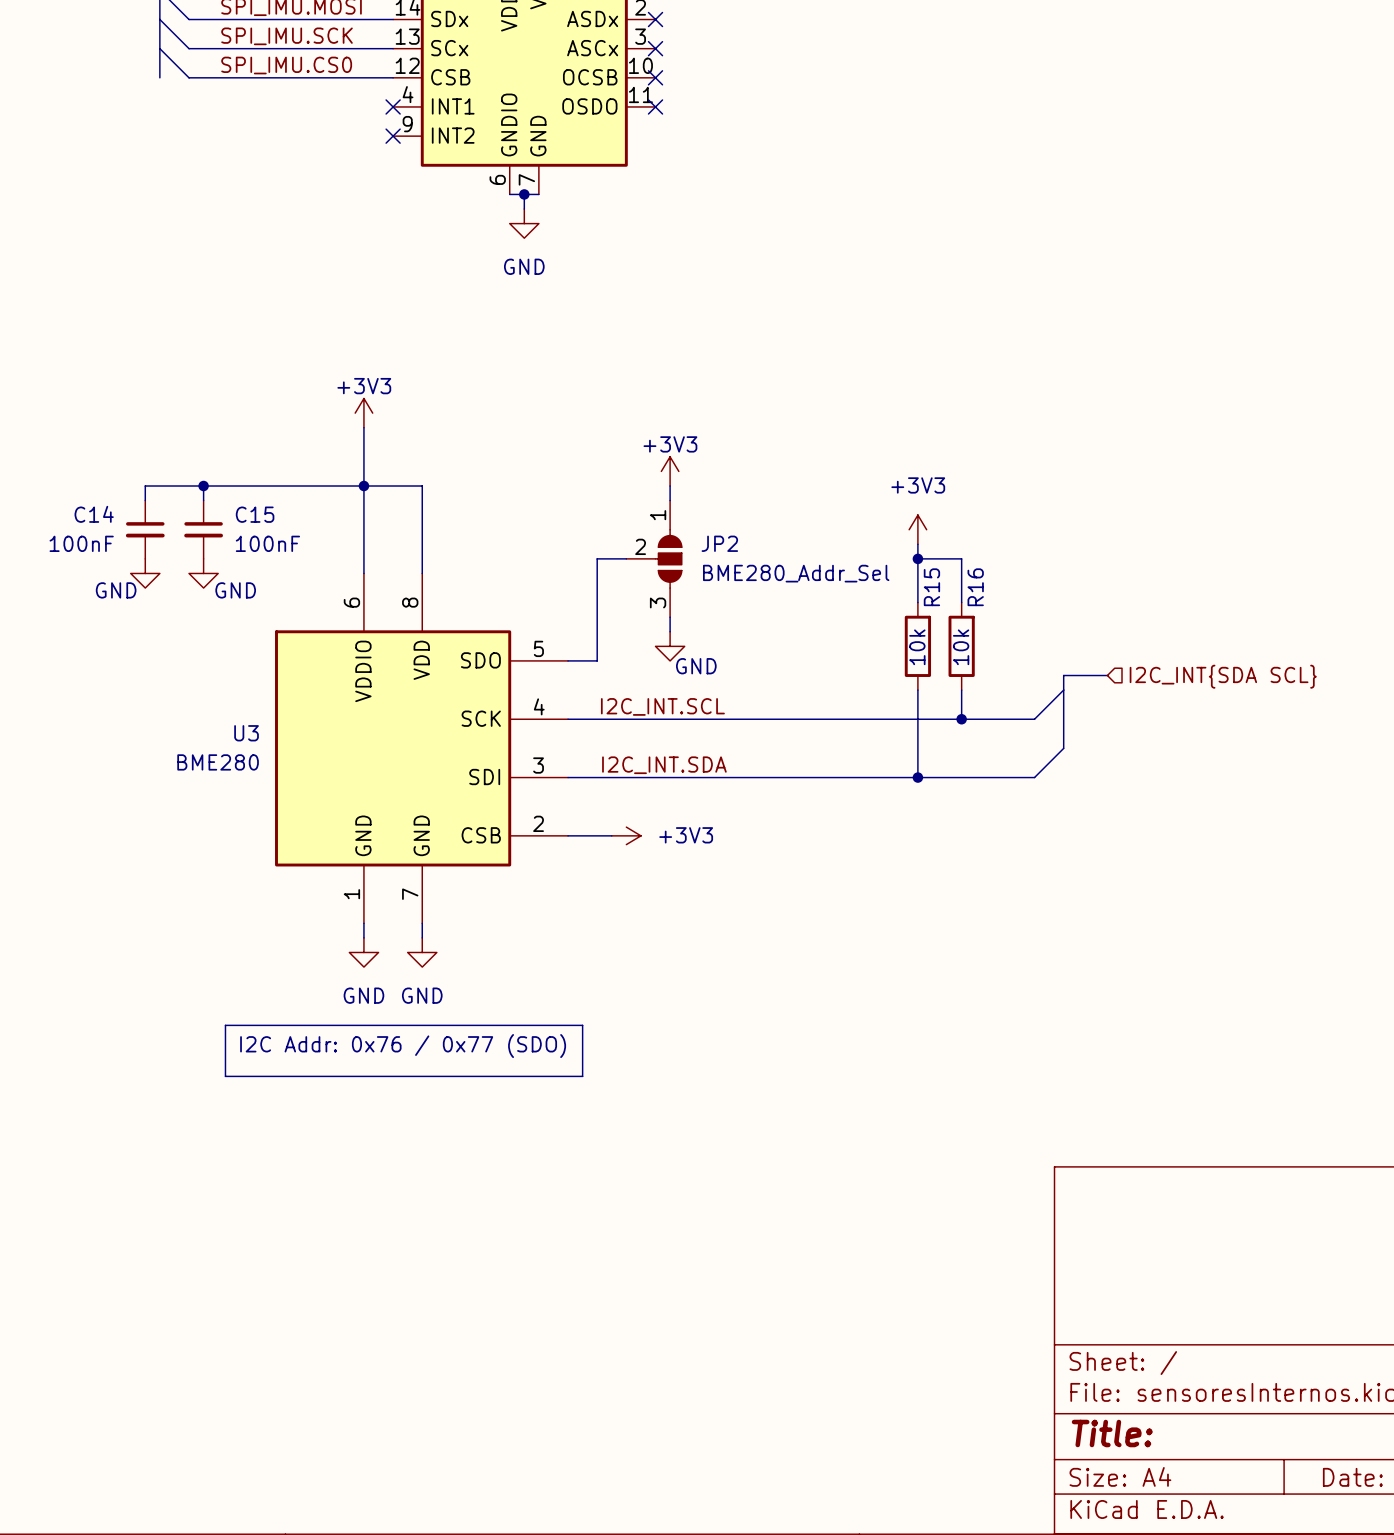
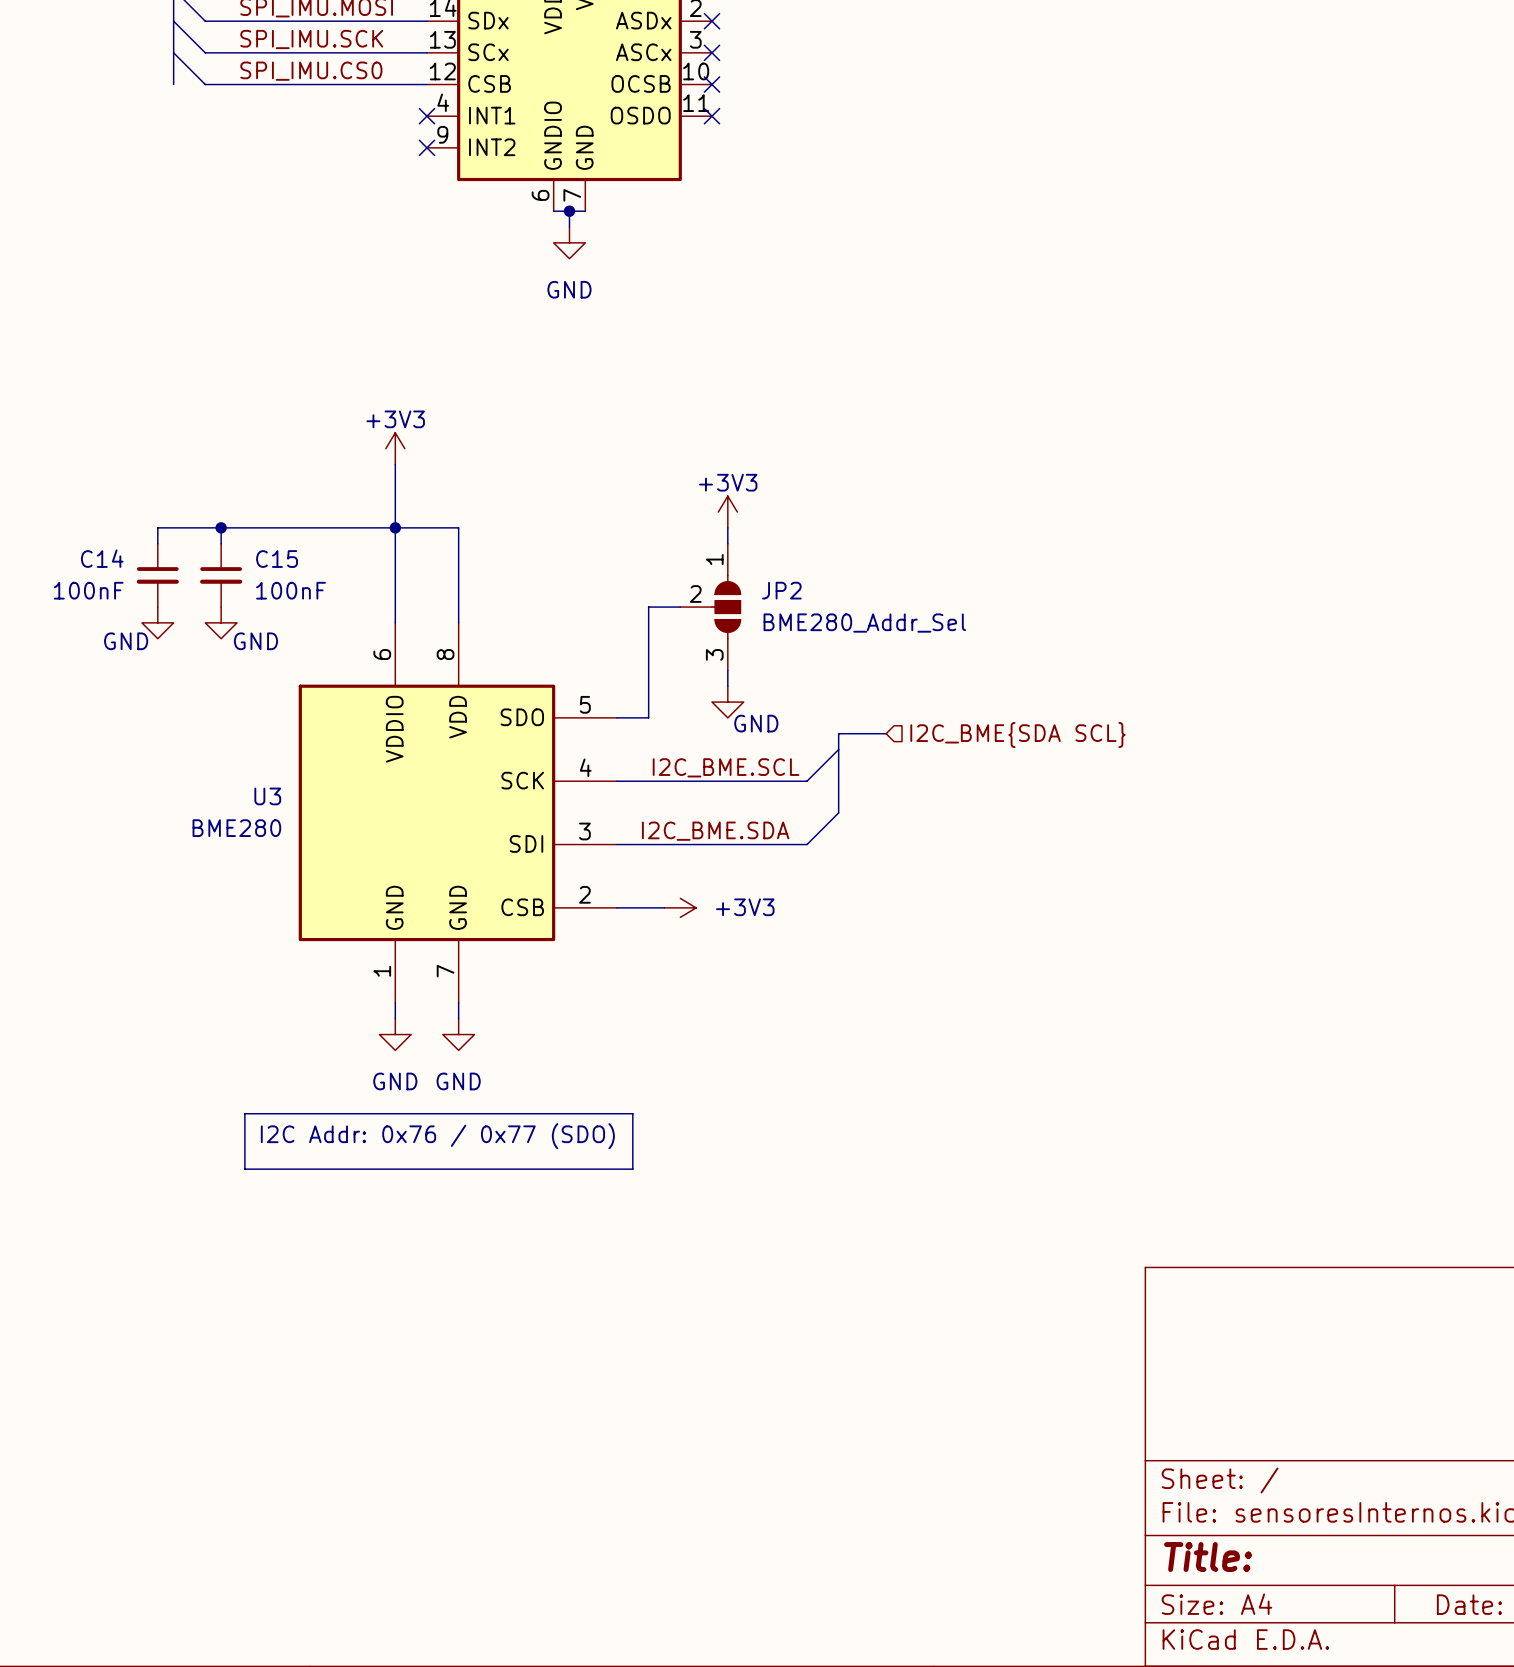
power symbol: +3V3 (917, 529) -> none
wire: (917, 544) (917, 602) -> none
wire: (917, 558) (961, 558) (961, 602) -> none
junction: (917, 558) -> none
R15: 10k (917, 646) -> none
R16: 10k (961, 646) -> none
bus: none -> (886, 733) (838, 733) (838, 812)
bus: (1107, 675) (1063, 675) (1063, 748) -> none
hierarchical label: none -> I2C_BME{SDA SCL} (1017, 735)
hierarchical label: I2C_INT{SDA SCL} (1223, 676) -> none
wire: (917, 690) (917, 777) -> none
wire: (961, 690) (961, 719) -> none
wire: (1063, 690) (1034, 719) (742, 719) -> (838, 749) (806, 781)
label: I2C_INT.SCL (662, 706) -> I2C_BME.SCL (726, 767)
junction: (961, 719) -> none
wire: (1063, 748) (1034, 777) (742, 777) -> (838, 812) (806, 844)
label: I2C_INT.SDA (664, 765) -> I2C_BME.SDA (715, 831)
junction: (917, 777) -> none

